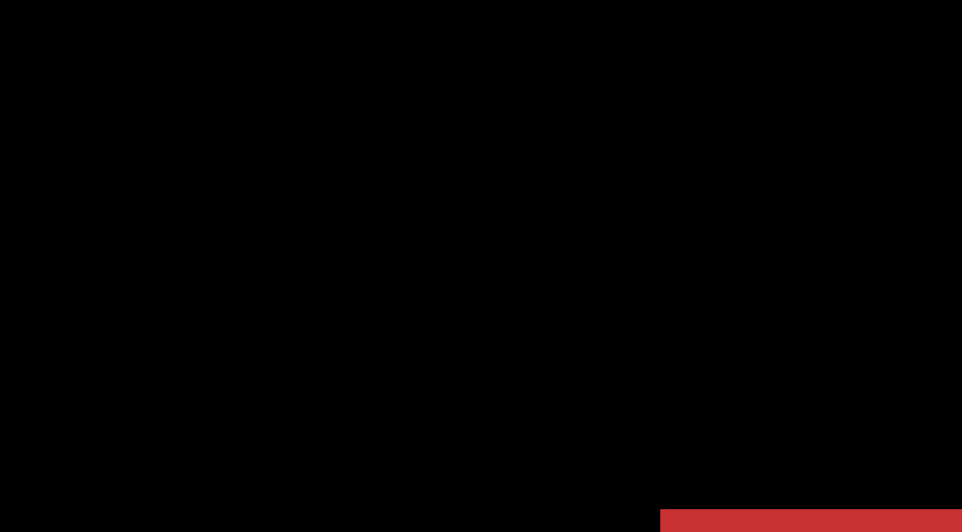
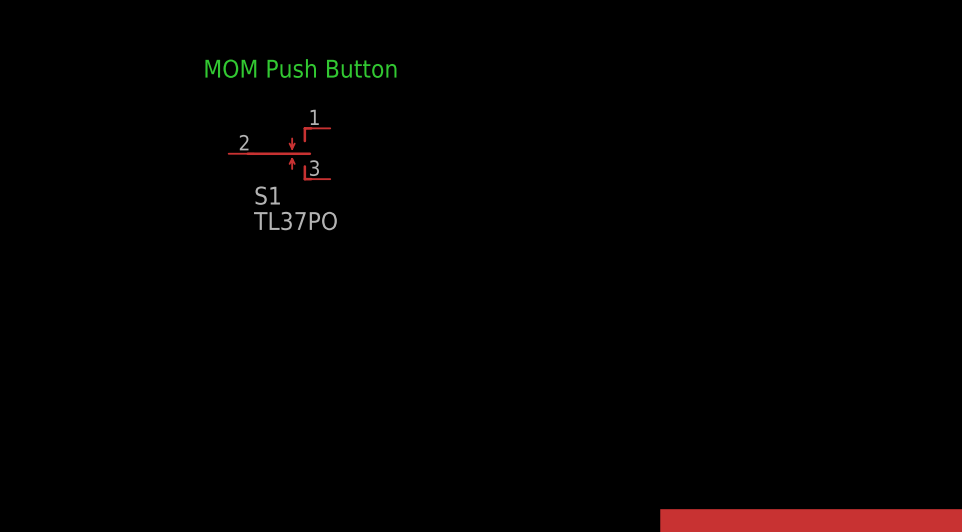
text: none -> MOM Push Button (300, 68)
S1: none -> TL37PO (279, 153)

